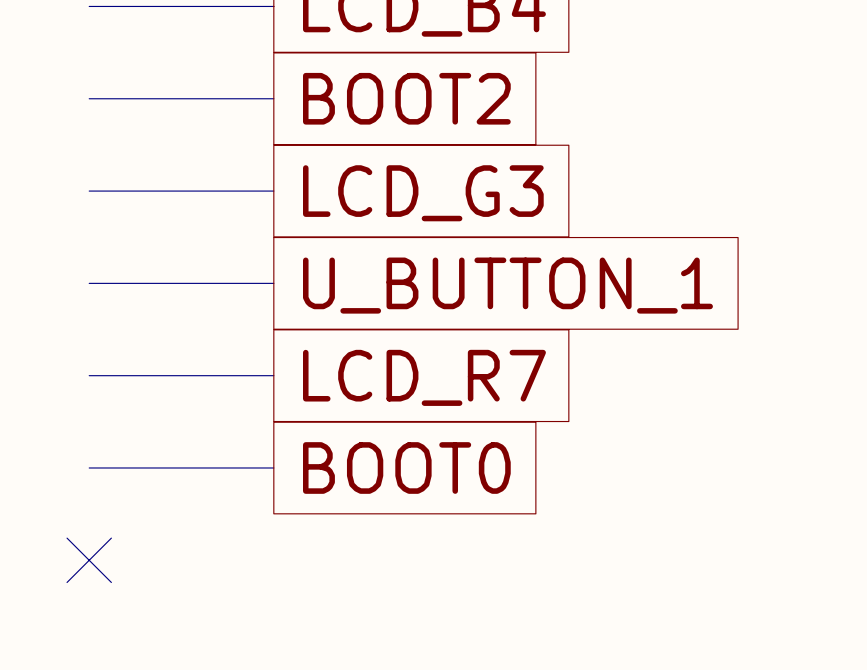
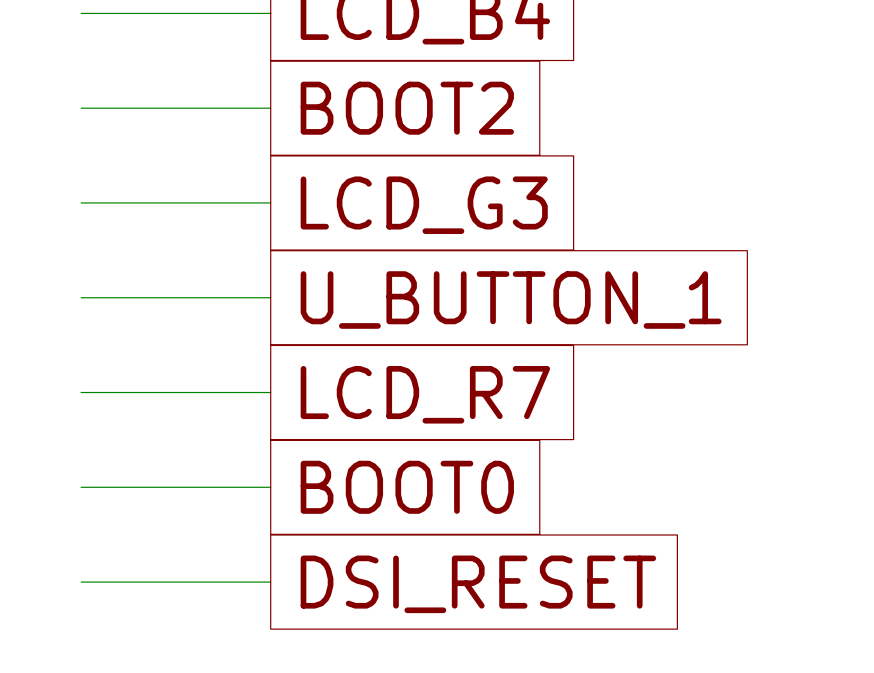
wire: none -> (81, 582) (270, 582)
no-connect mark: (89, 560) -> none
global label: none -> DSI_RESET (478, 584)

